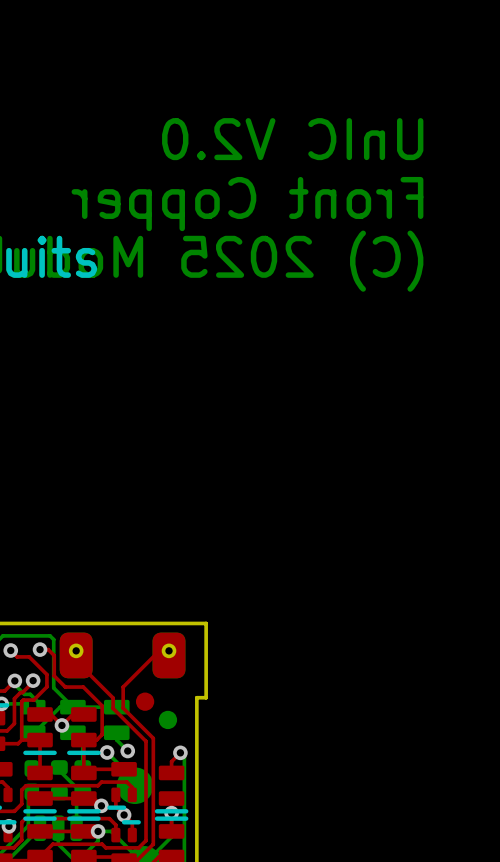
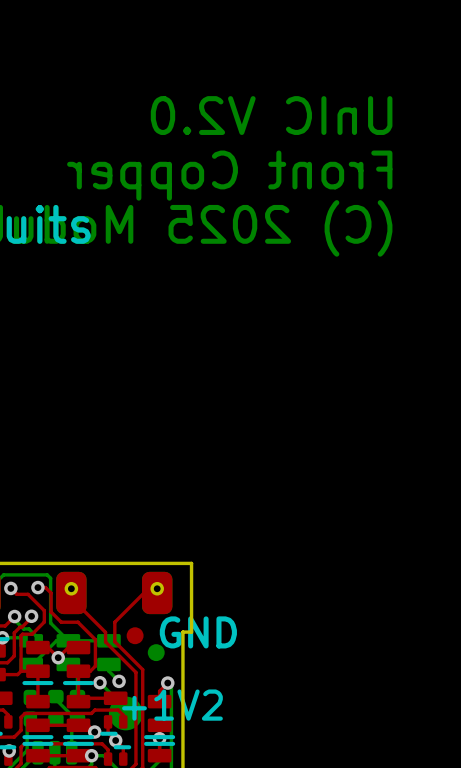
text: none -> GND (198, 632)
text: none -> +1V2 (172, 705)

